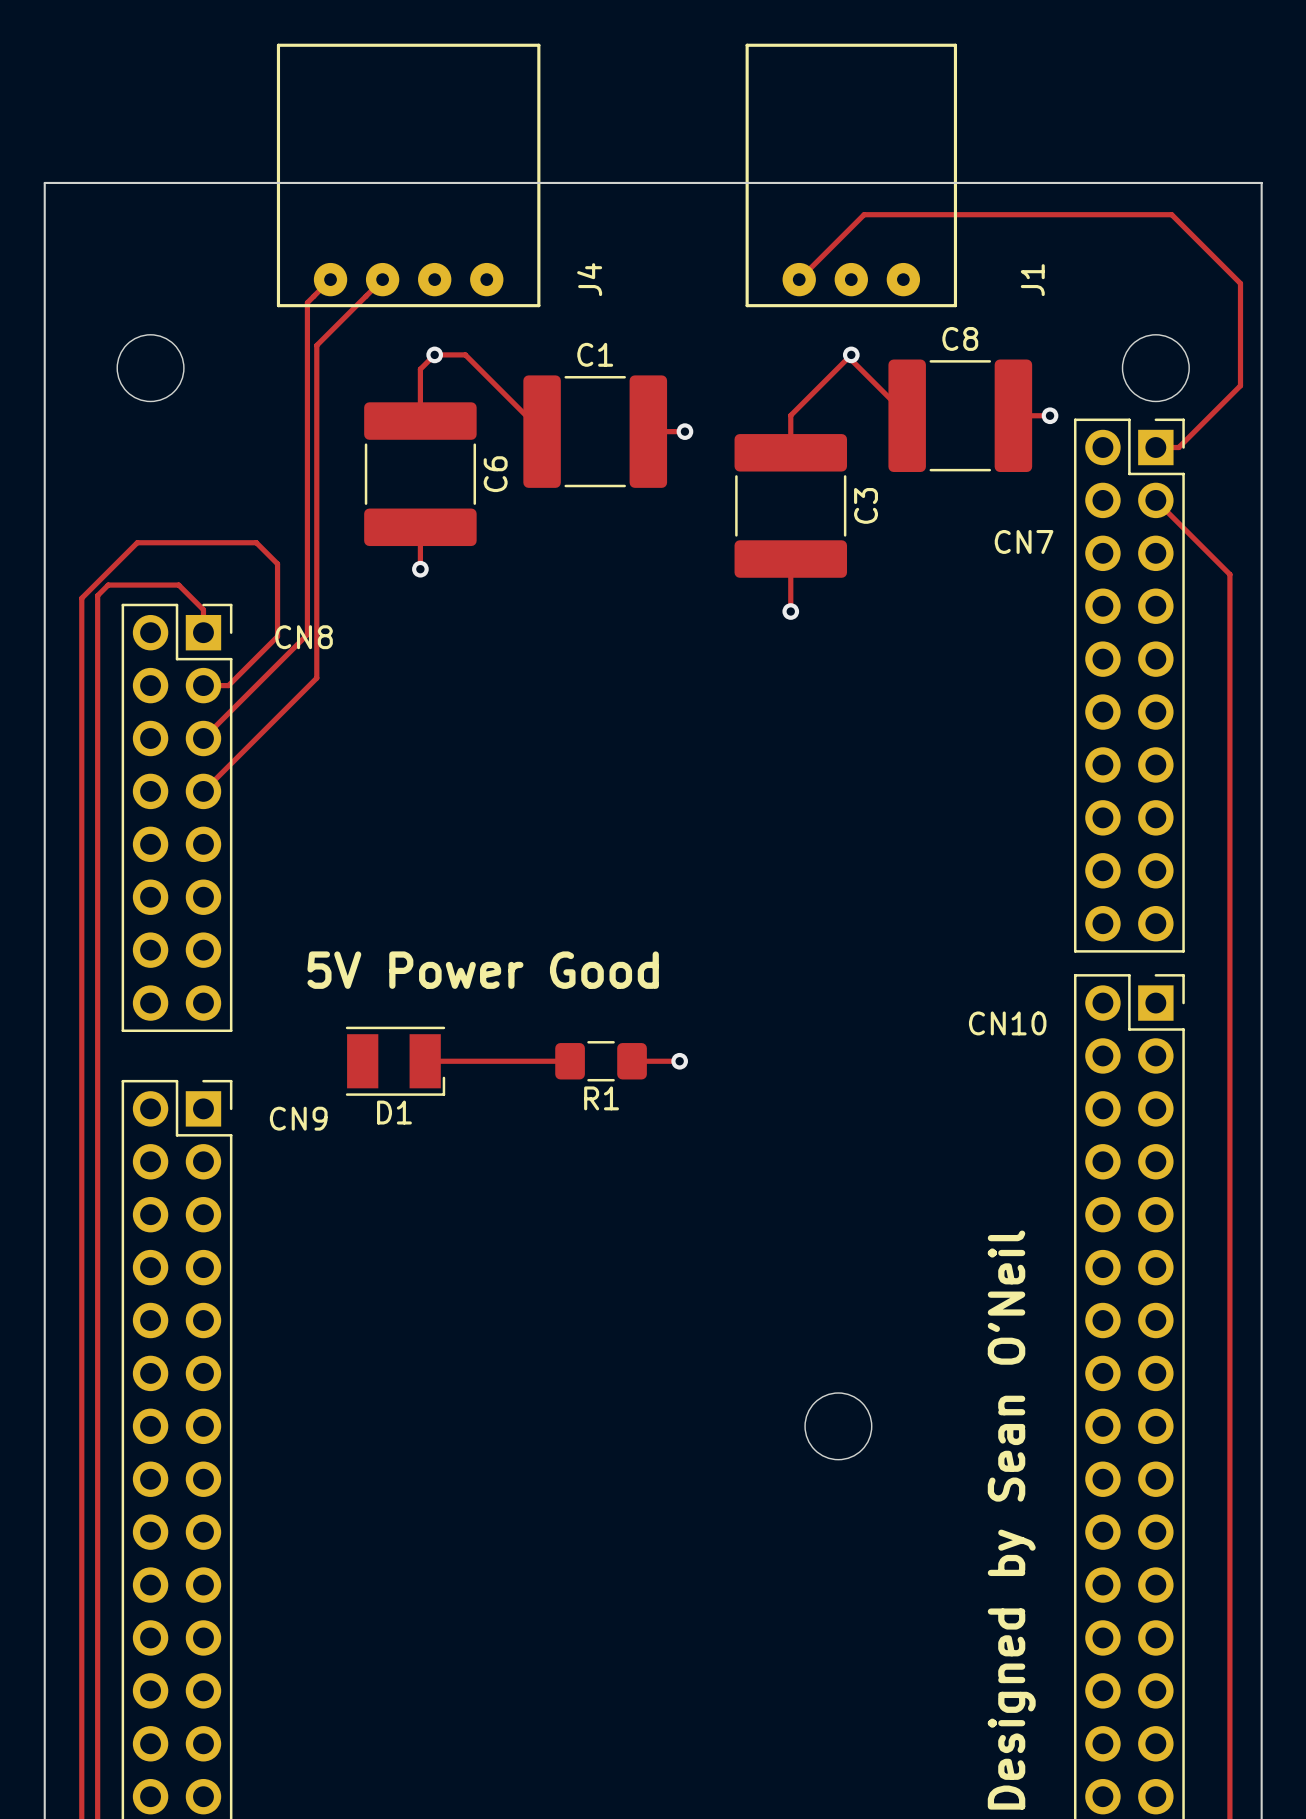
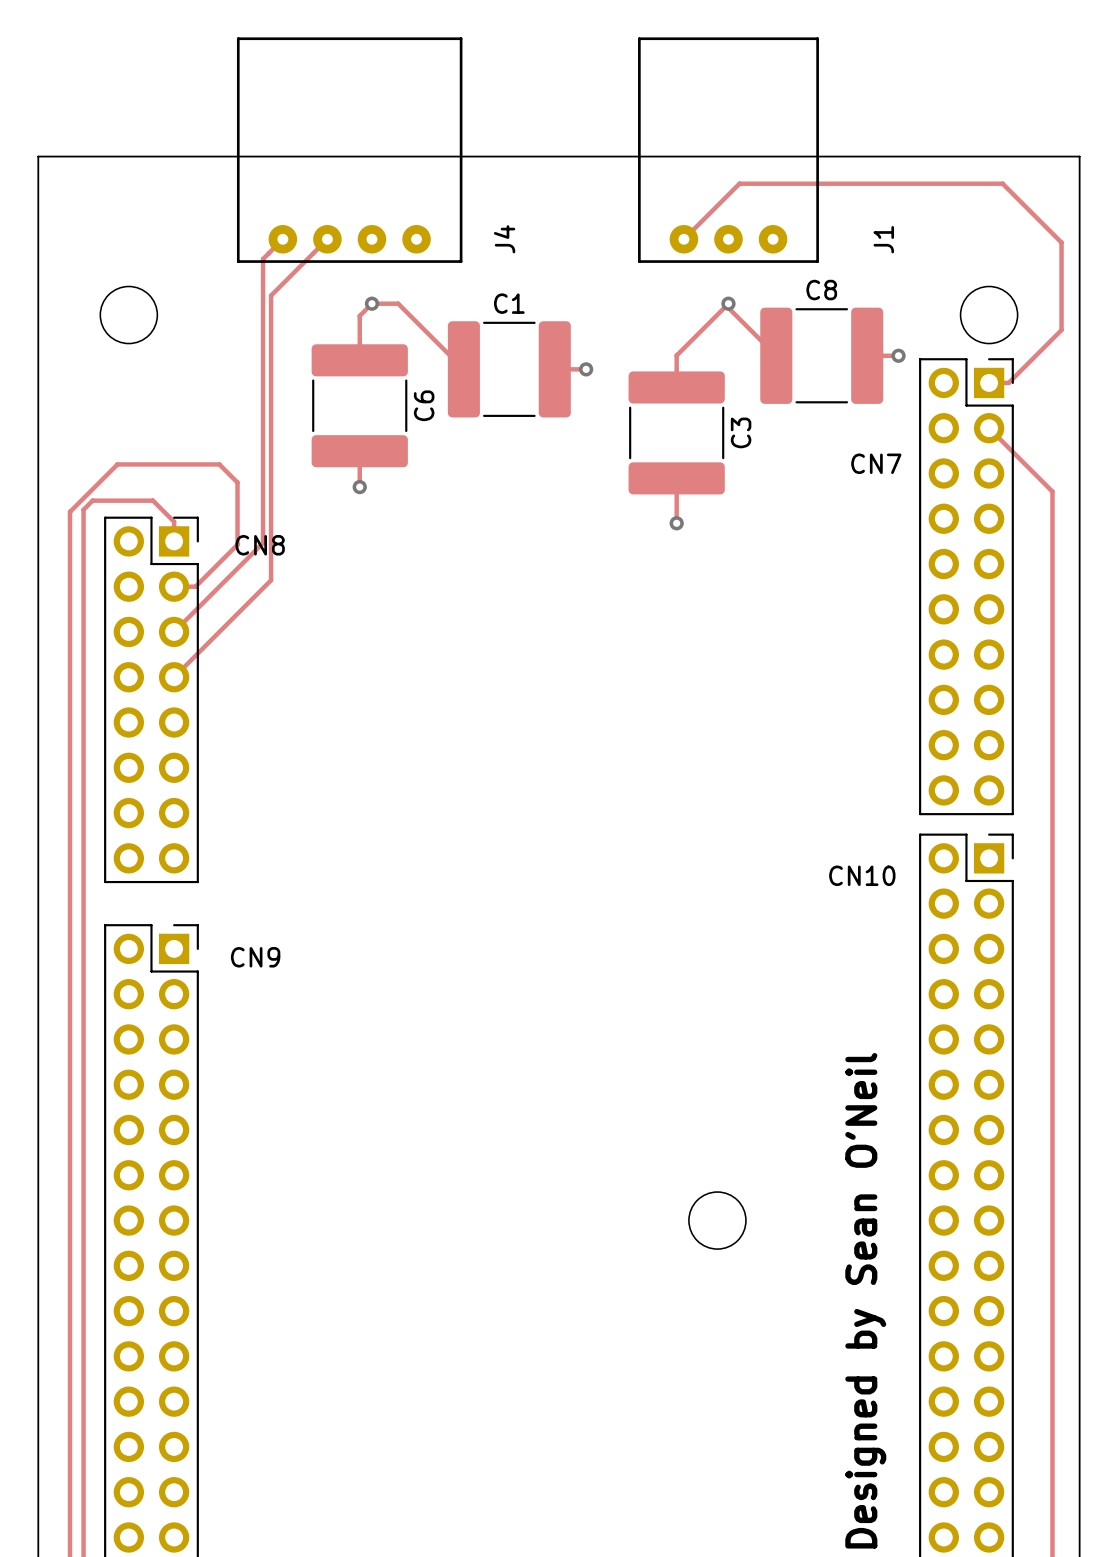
text: 5V Power Good (483, 970) -> none
D1: (395, 1061) -> none
track: (425, 1061) (570, 1061) -> none
R1: (601, 1061) -> none
track: (632, 1061) (679, 1061) -> none
via: (679, 1061) -> none

